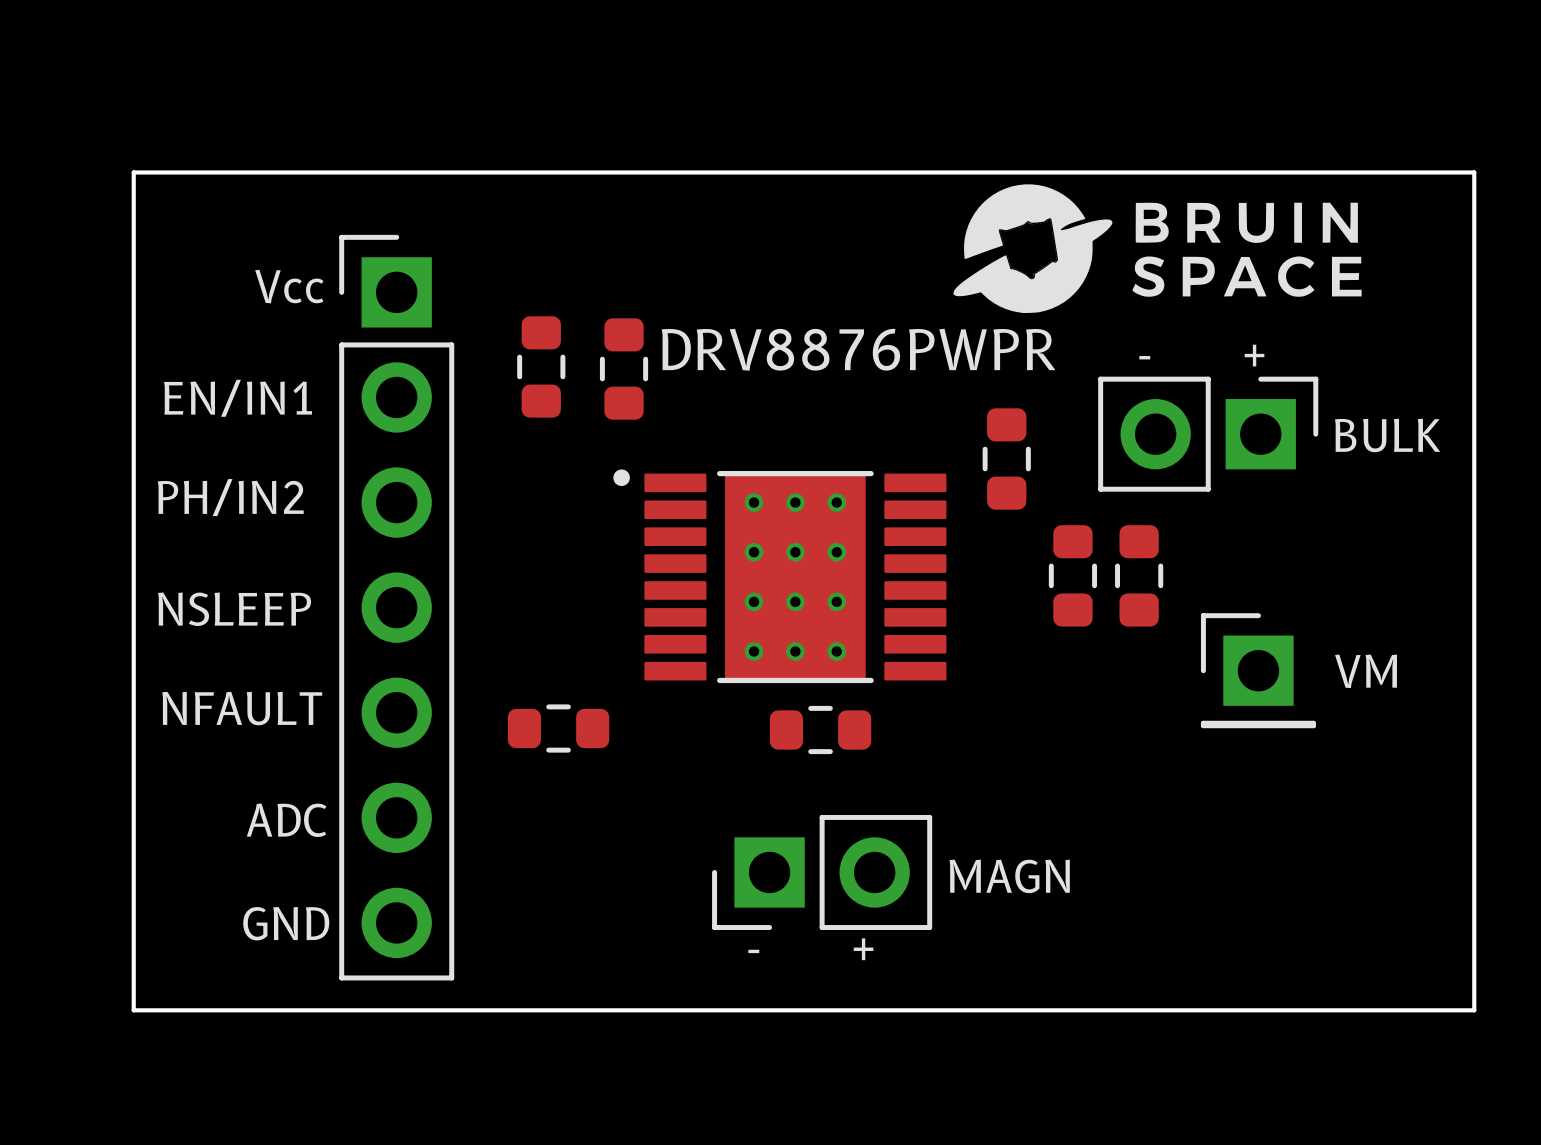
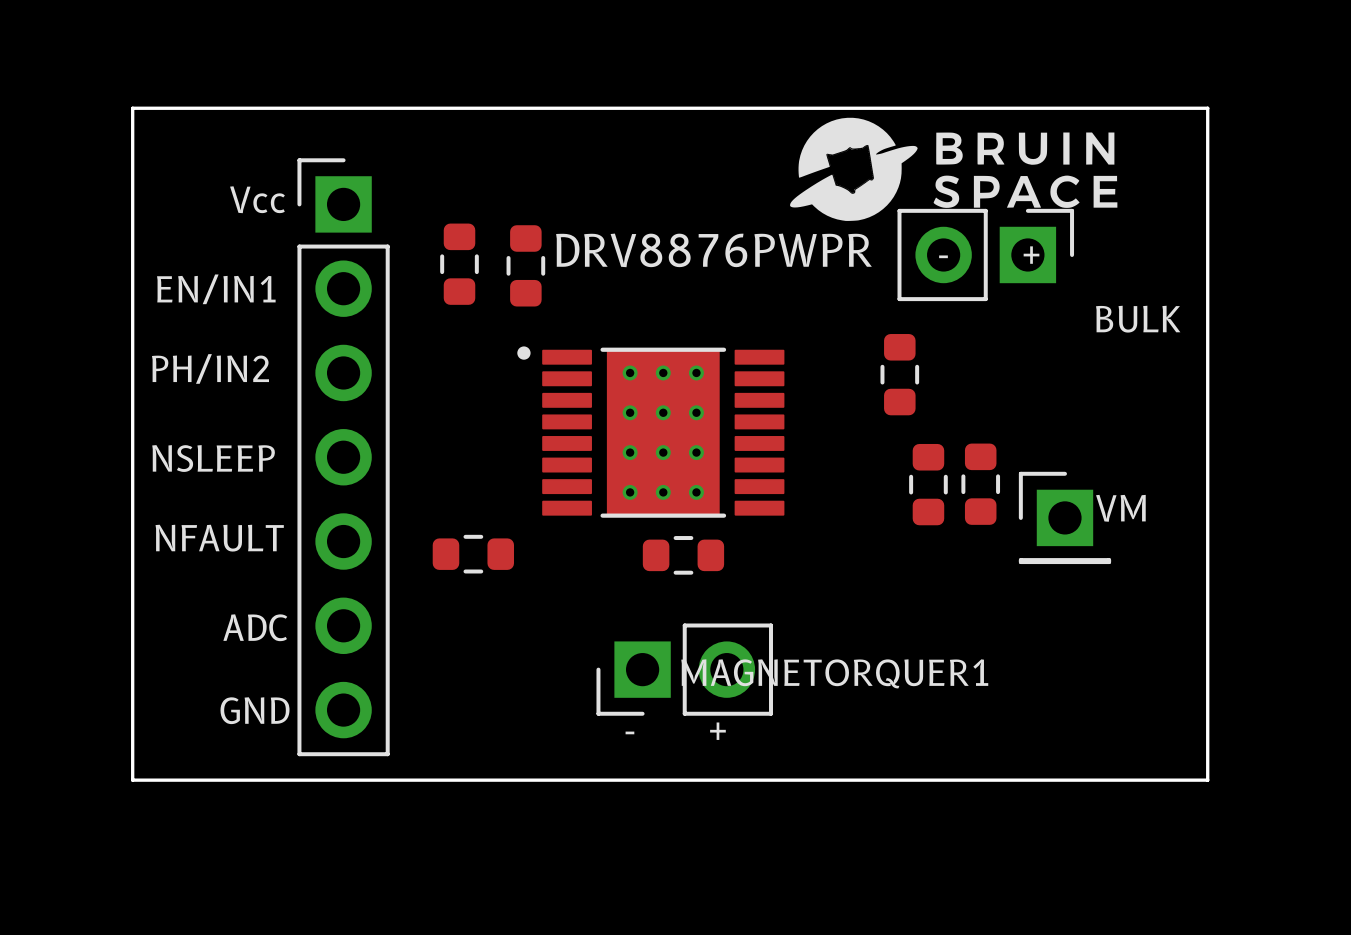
part position: (1208, 434) -> (985, 254)
part: (1006, 459) -> none
part: none -> (899, 374)
part: (1072, 575) -> none
part: (1139, 575) -> none
part: none -> (928, 484)
part: none -> (980, 484)
part position: (1258, 670) -> (1064, 517)
MAGN name: MAGN (1009, 876) -> MAGNETORQUER1 (834, 673)

